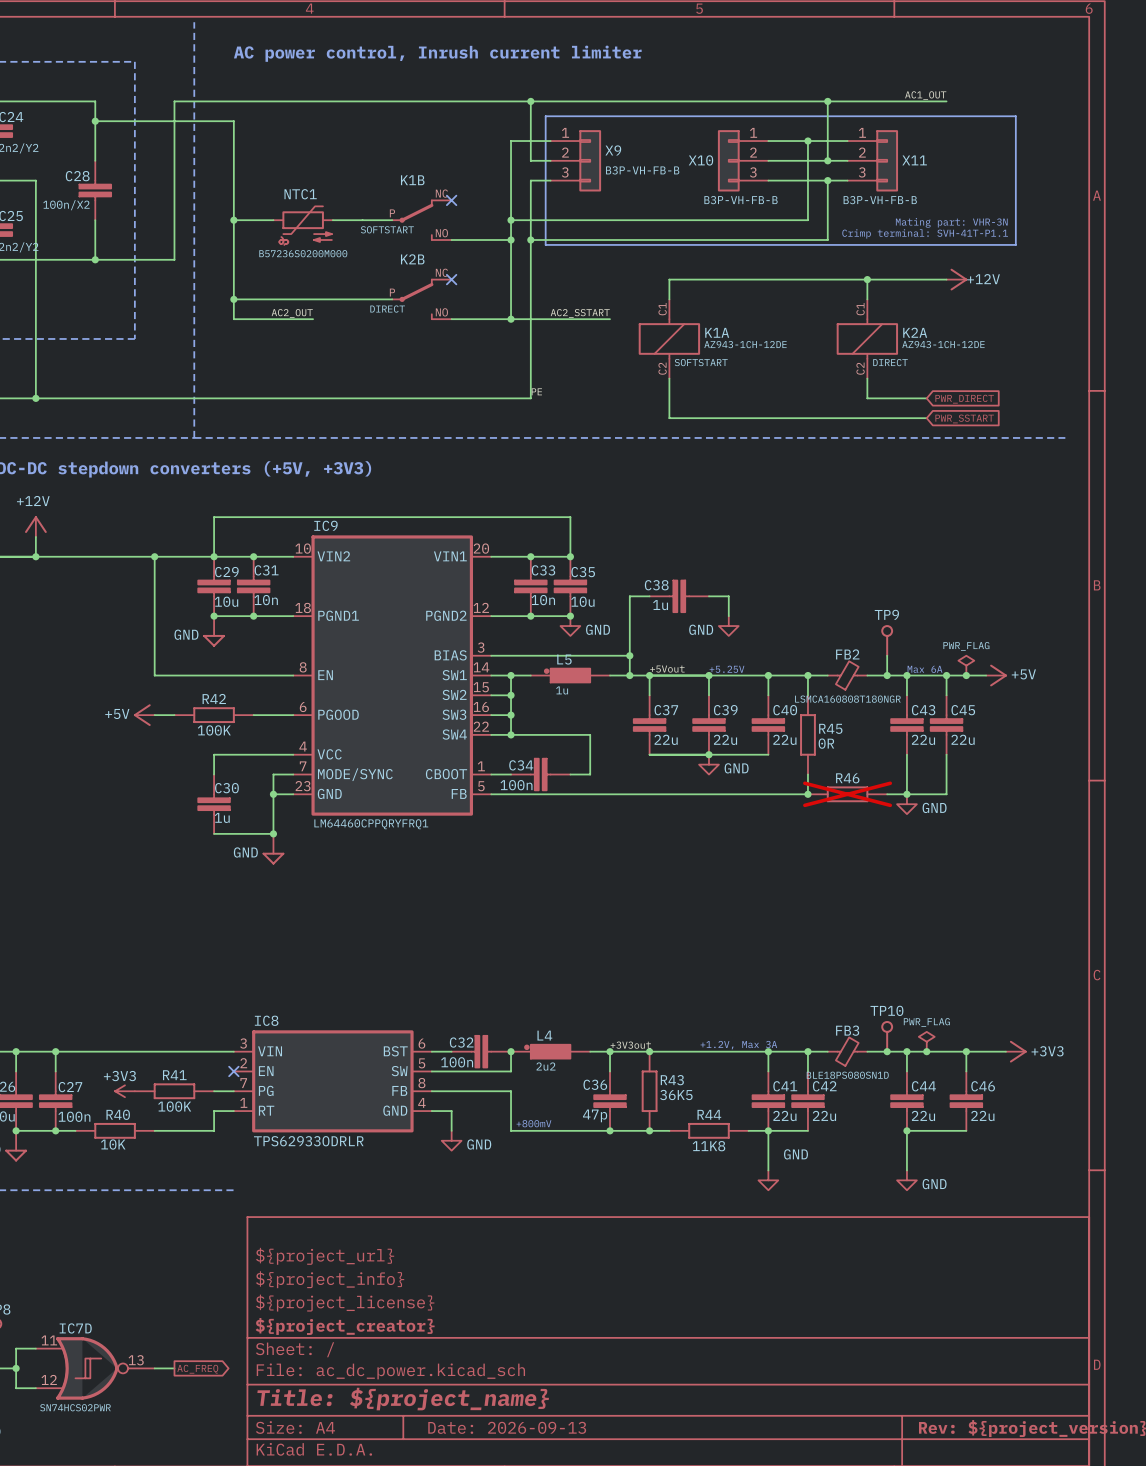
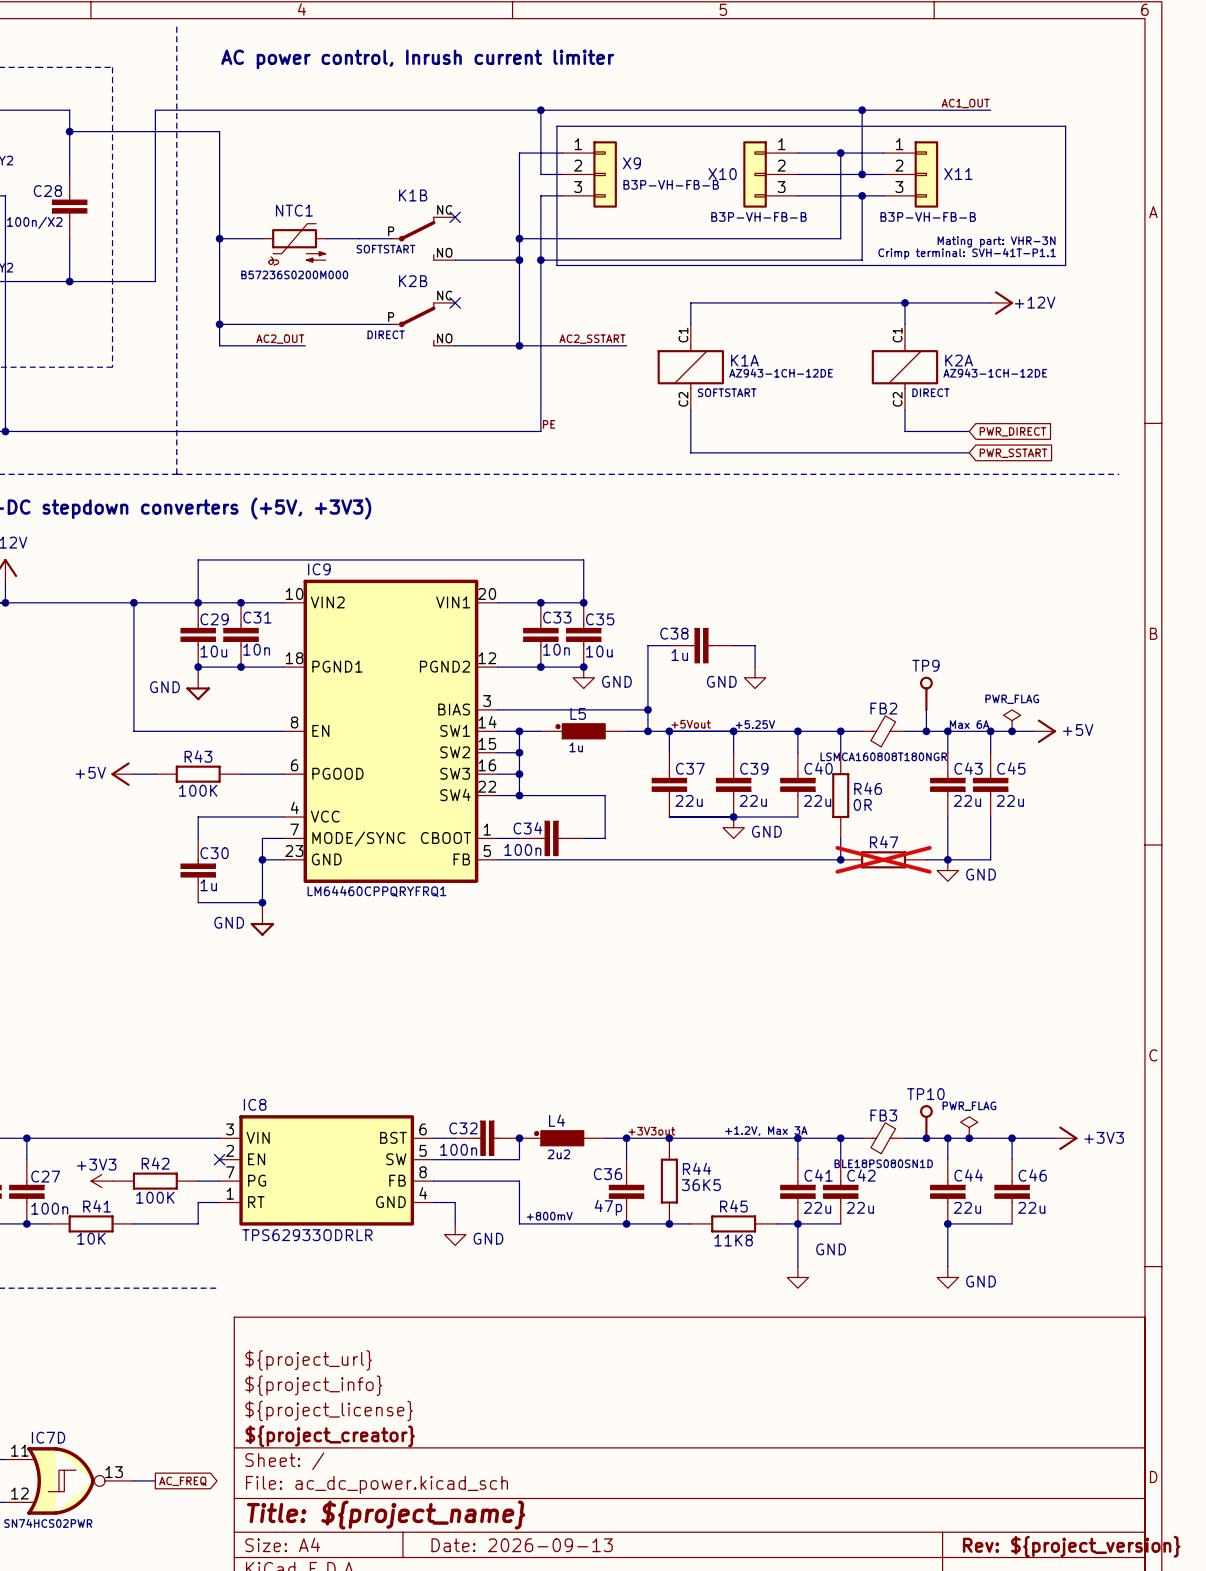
R42 name: R42 (214, 698) -> R43 (198, 756)
R45 name: R45 (830, 728) -> R46 (868, 788)
R46 name: R46 (847, 778) -> R47 (884, 842)
R41 name: R41 (174, 1075) -> R42 (155, 1163)
R43 name: R43 (672, 1080) -> R44 (697, 1168)
R40 name: R40 (118, 1114) -> R41 (97, 1206)
R44 name: R44 (709, 1114) -> R45 (733, 1206)

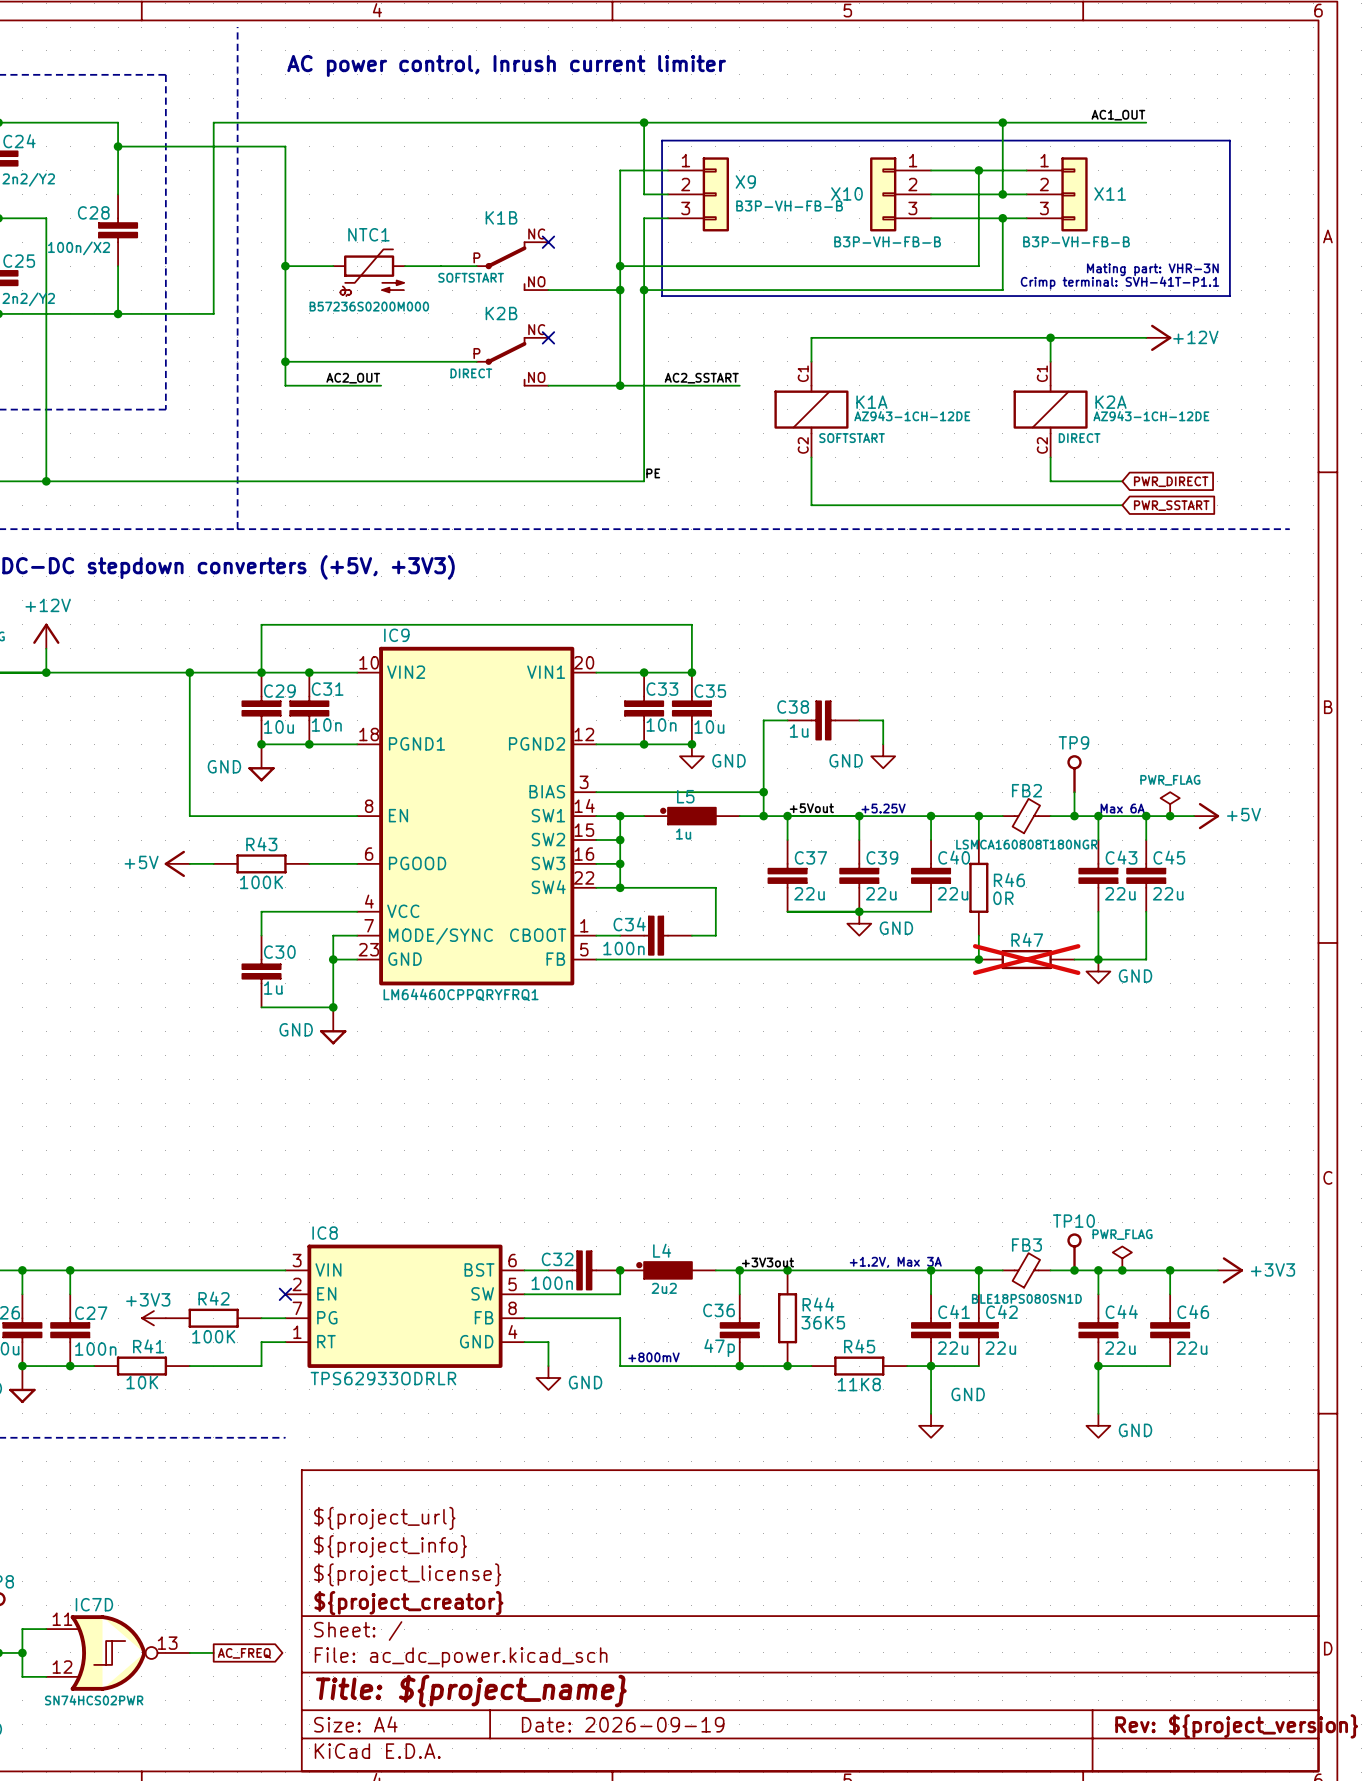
title block: Date: 2026-09-13 (522, 1545) -> Date: 2026-09-19 (623, 1724)

